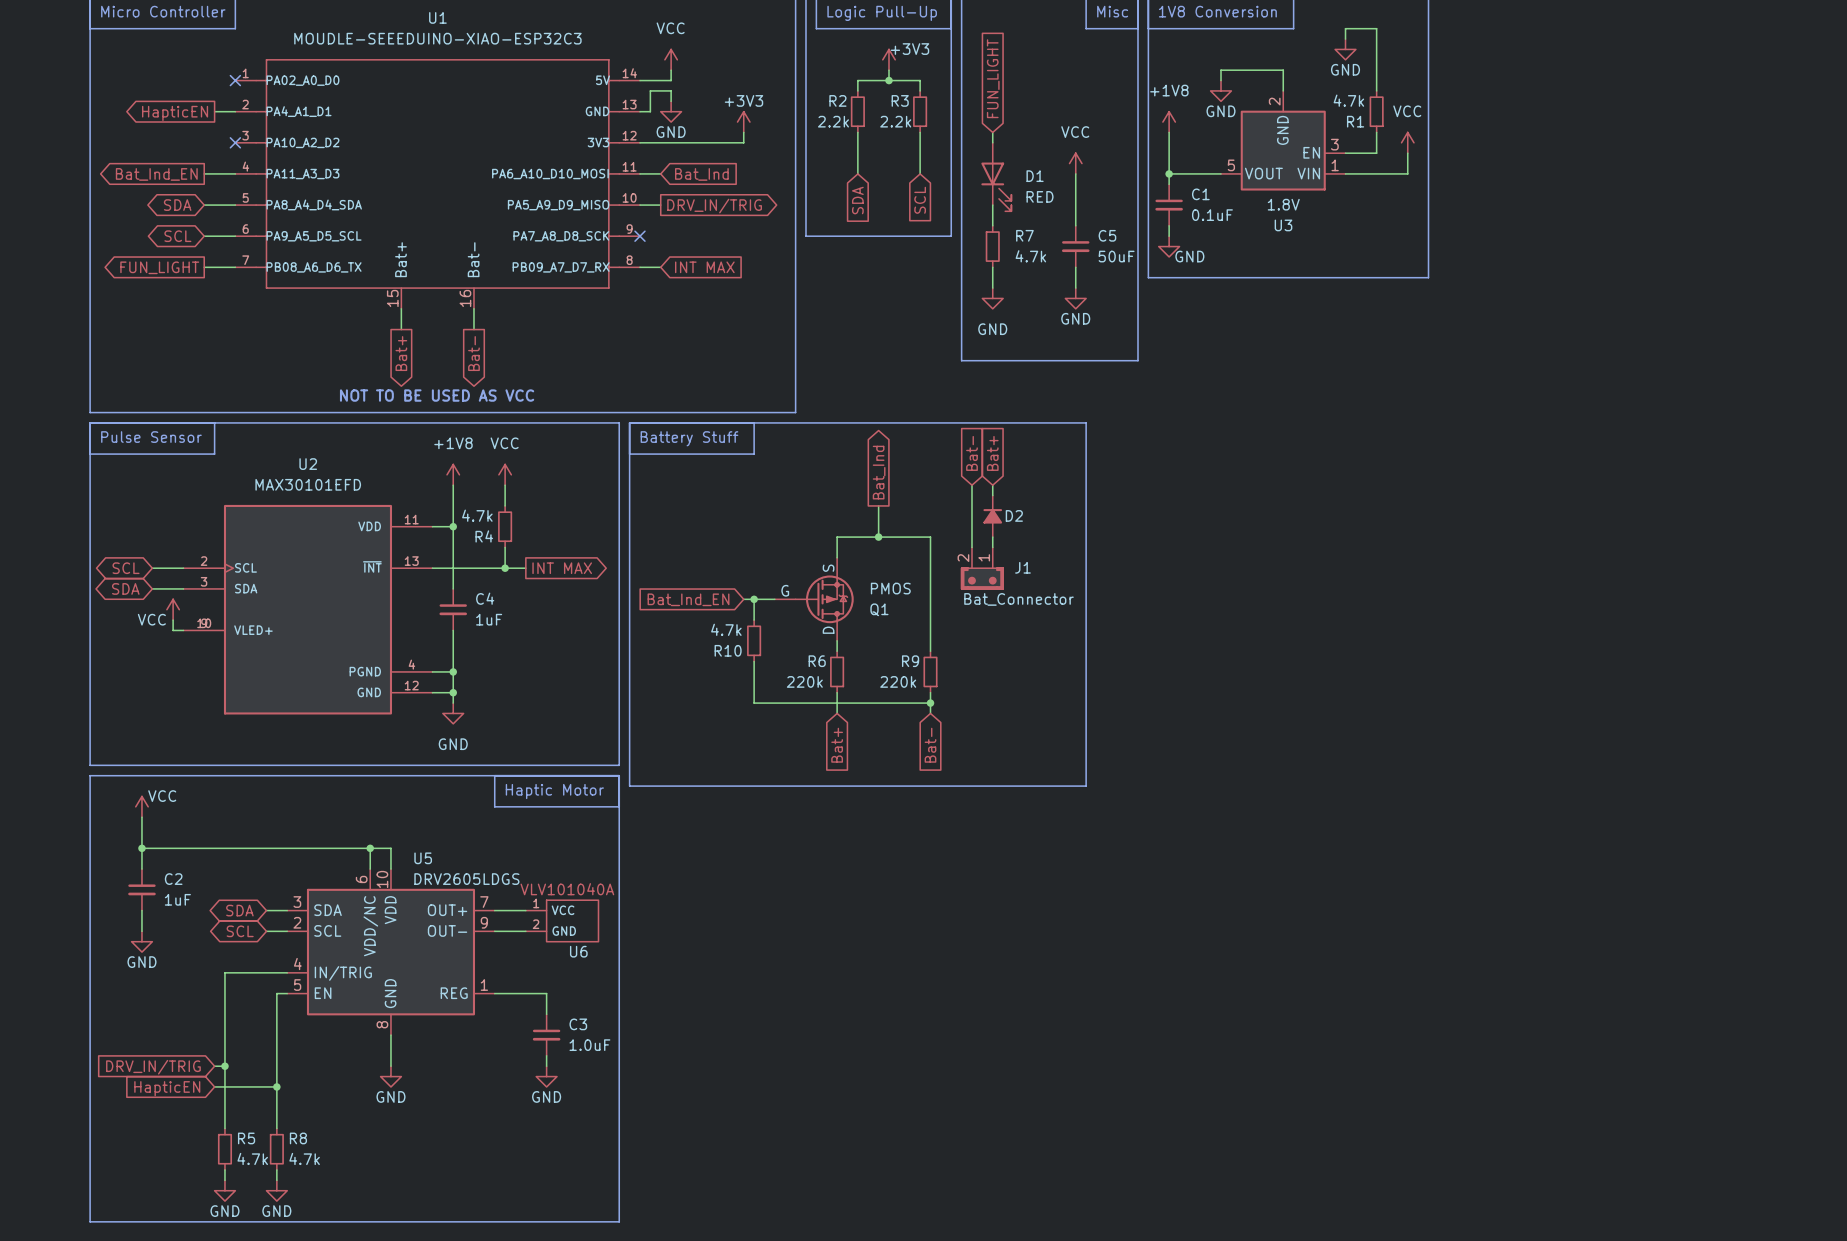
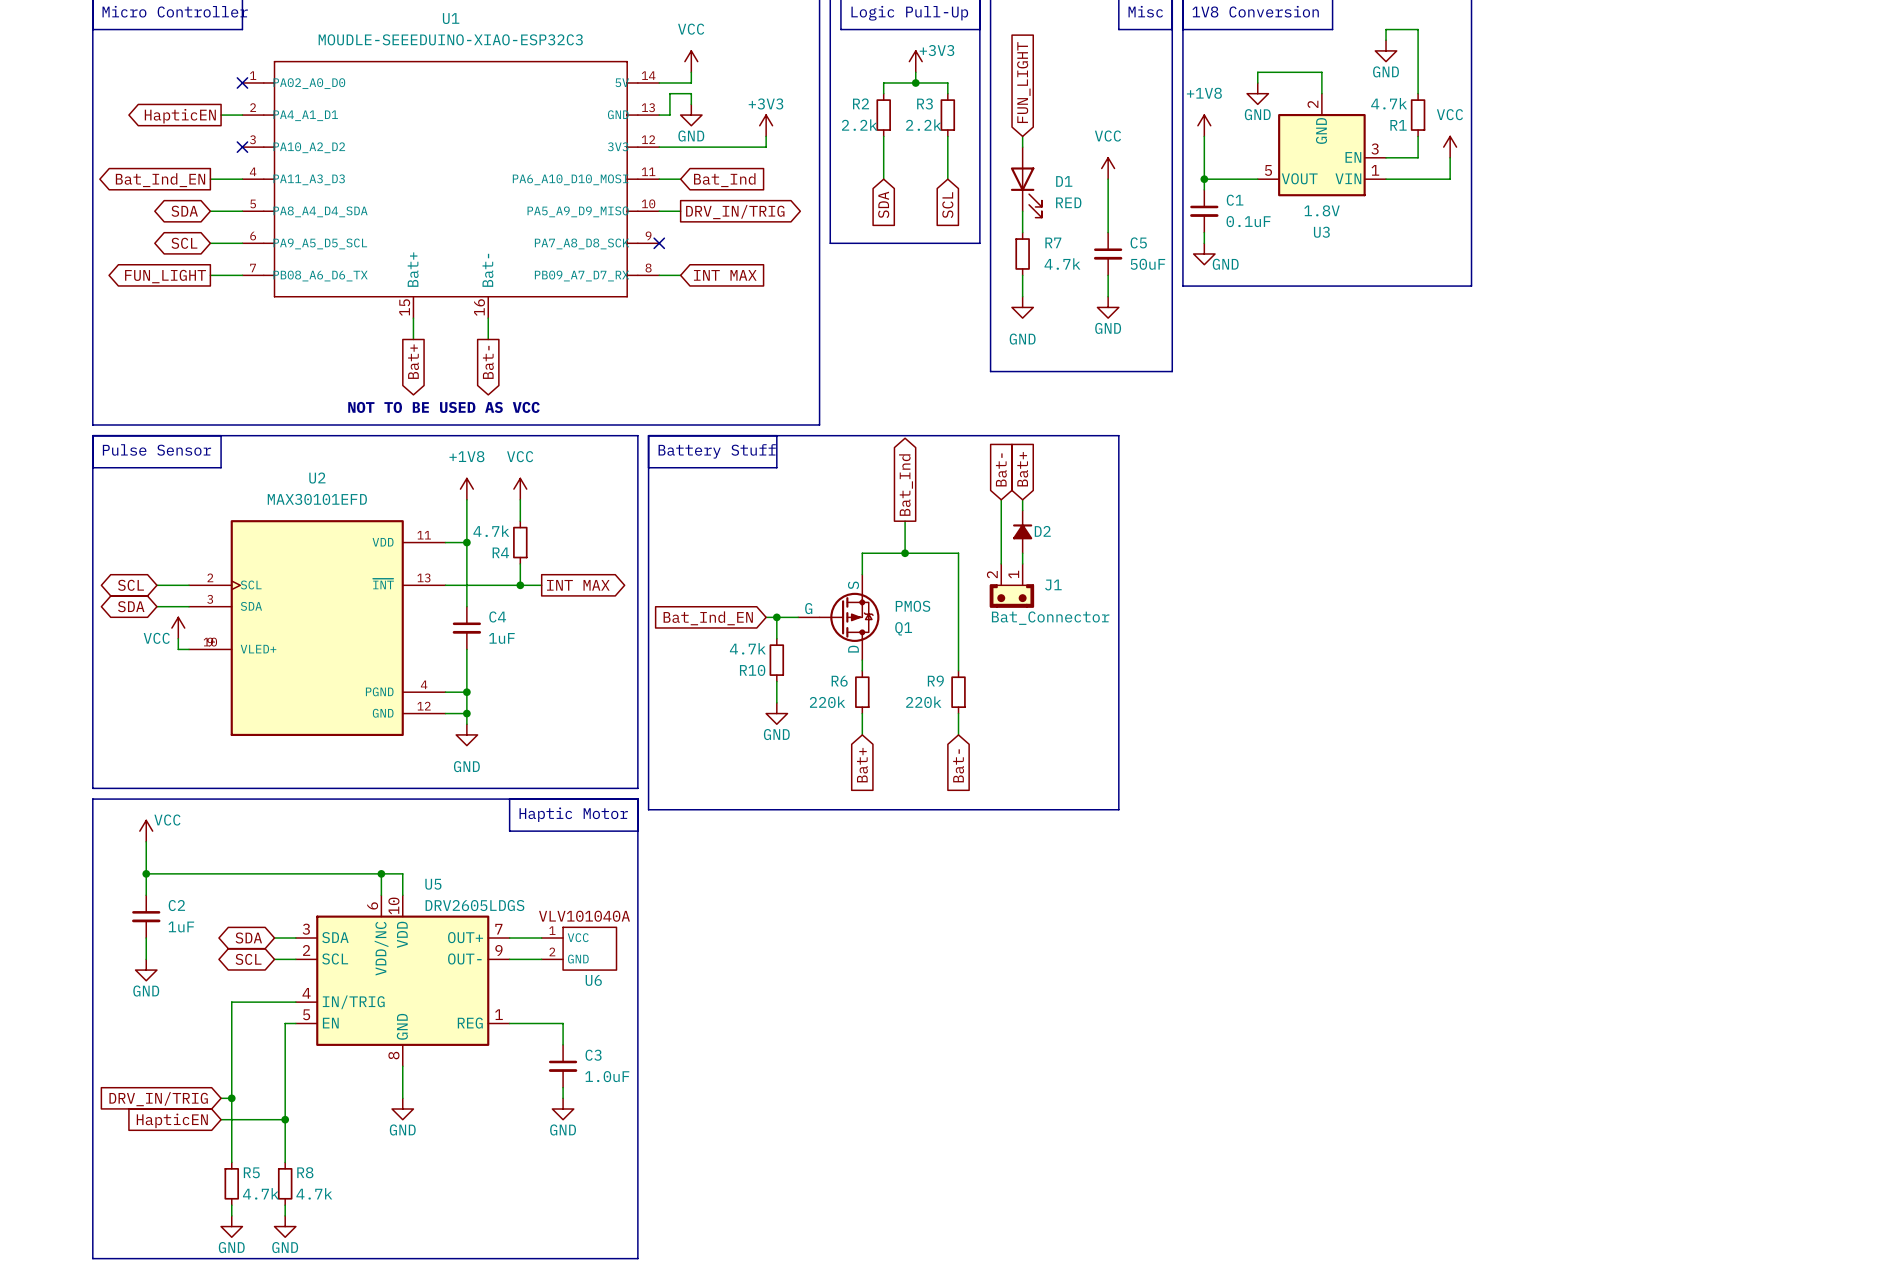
wire: (754, 682) (754, 703) (930, 703) -> none
power symbol: none -> GND (776, 713)
junction: (930, 703) -> none

